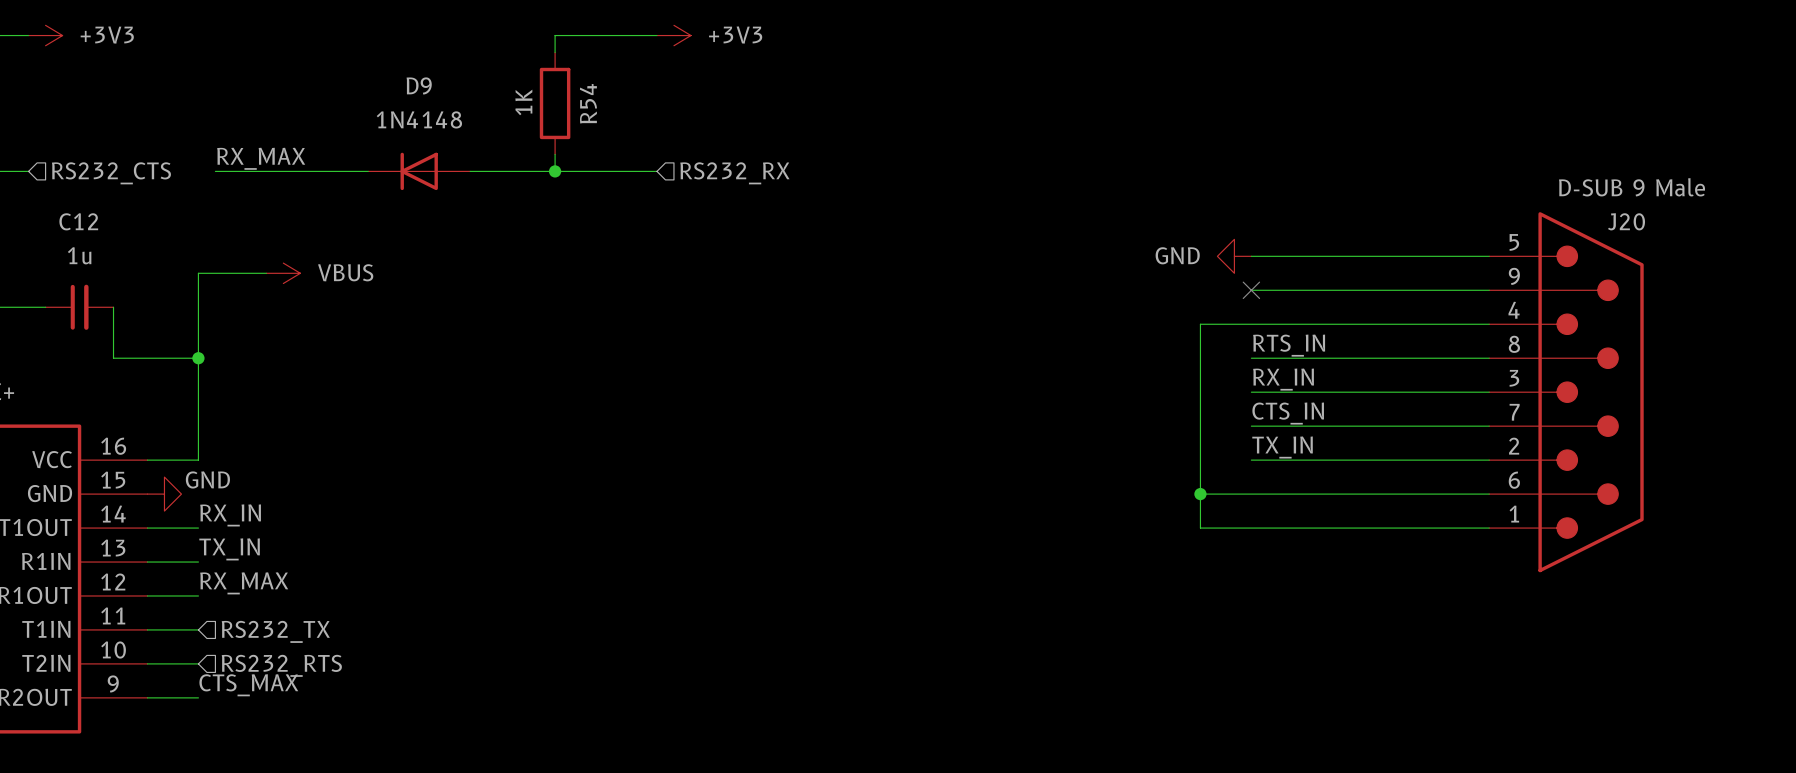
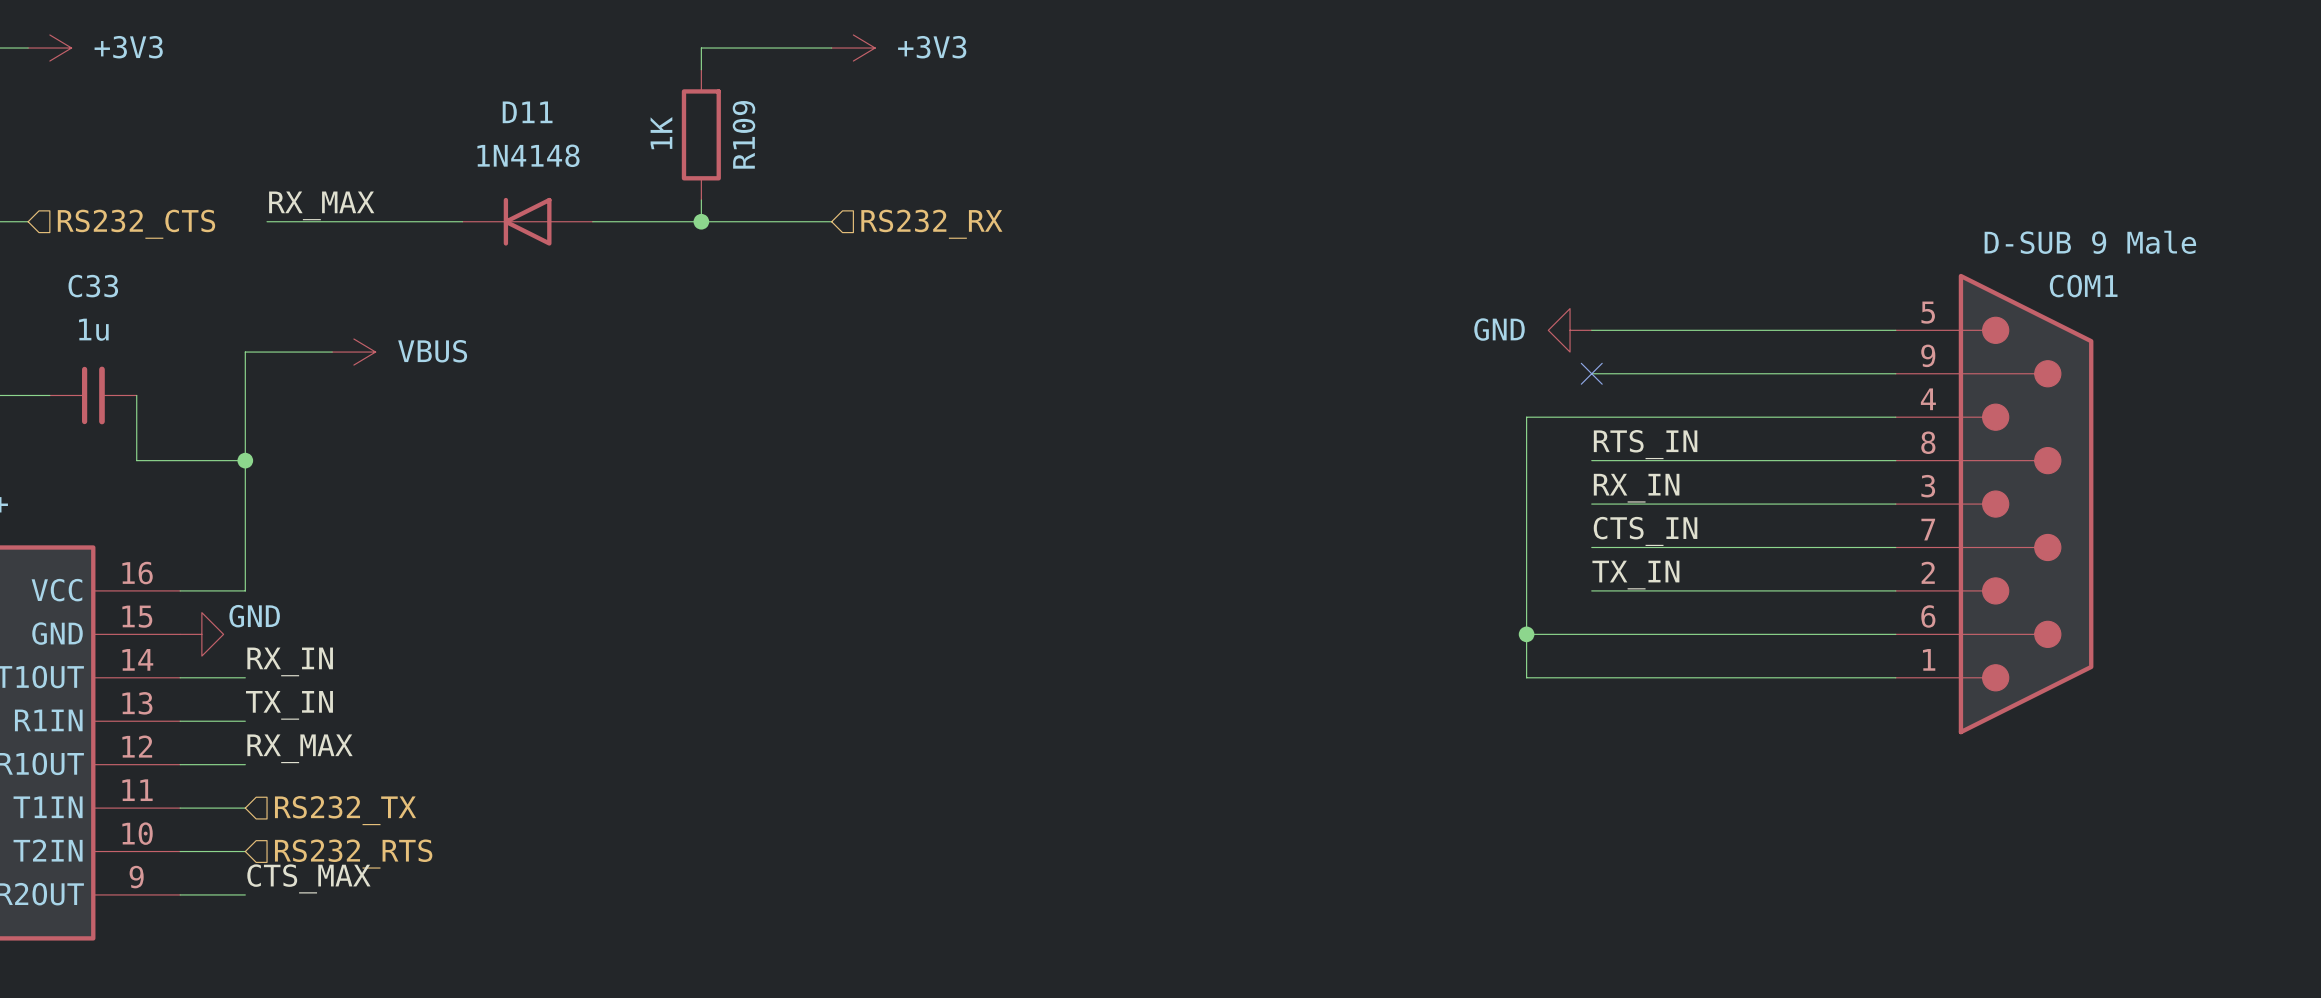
D9 name: D9 (419, 85) -> D11 (527, 112)
R54 name: R54 (588, 103) -> R109 (744, 134)
C12 name: C12 (78, 221) -> C33 (93, 286)
J20 name: J20 (1626, 221) -> COM1 (2083, 286)

